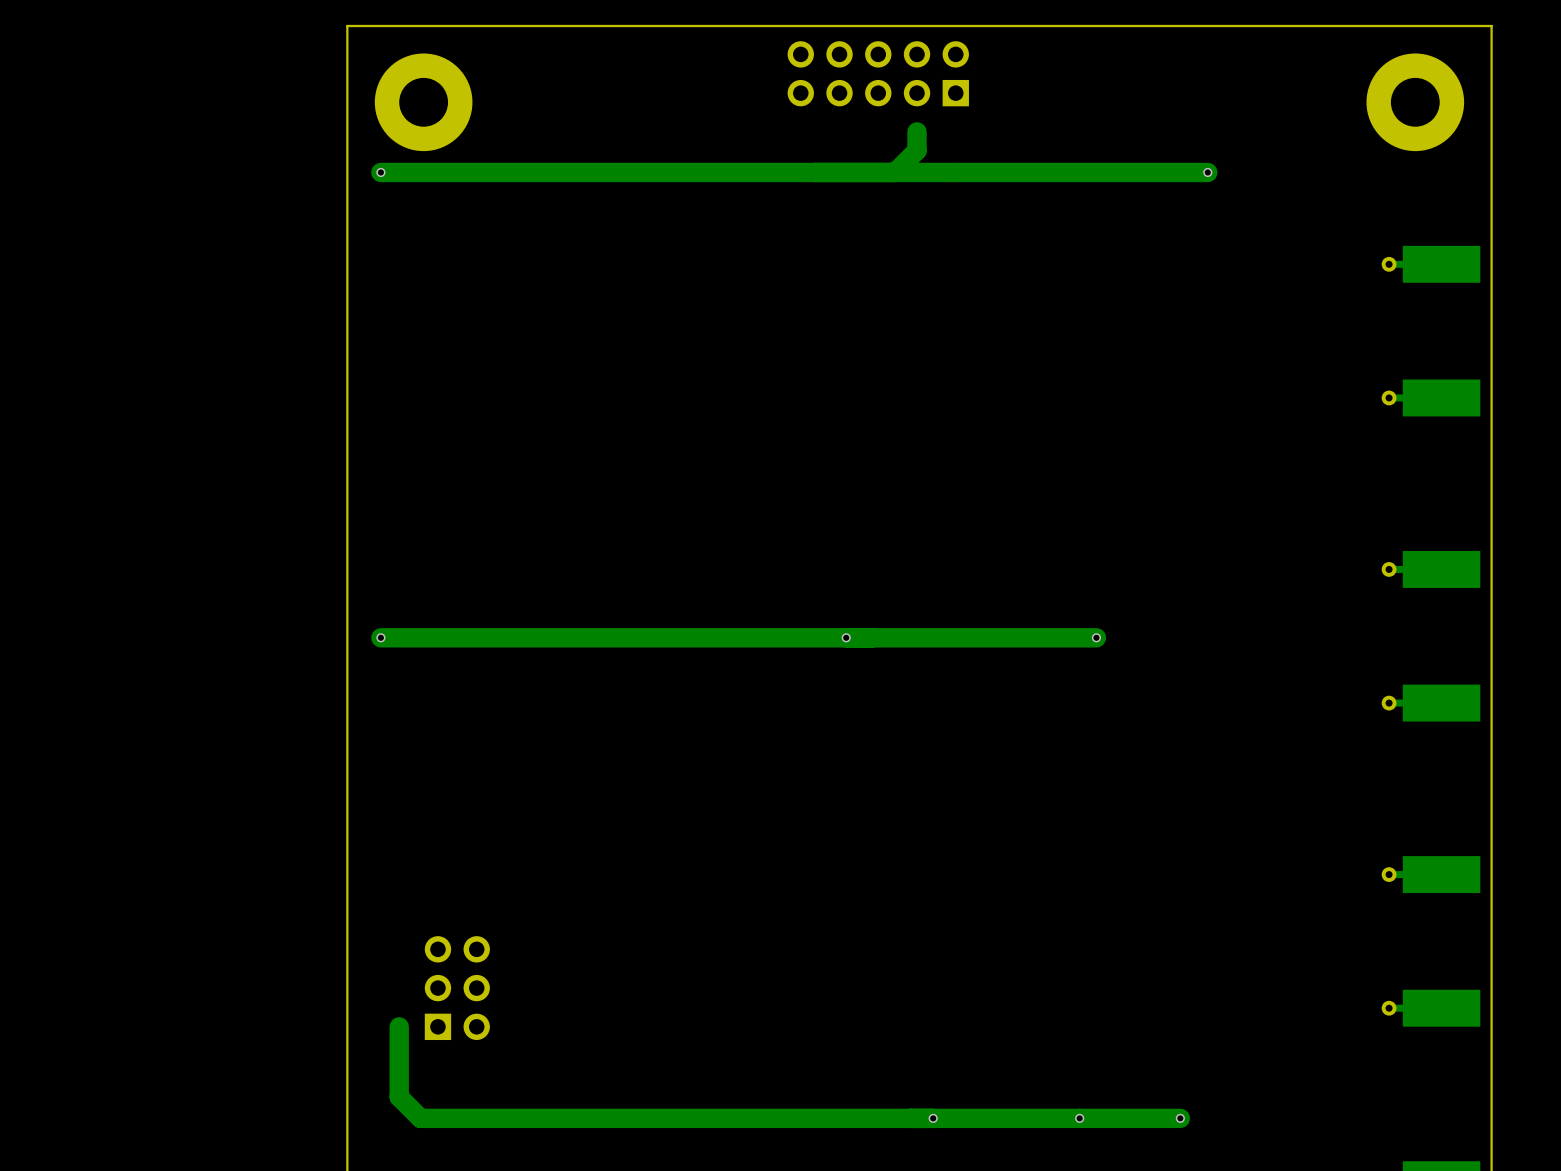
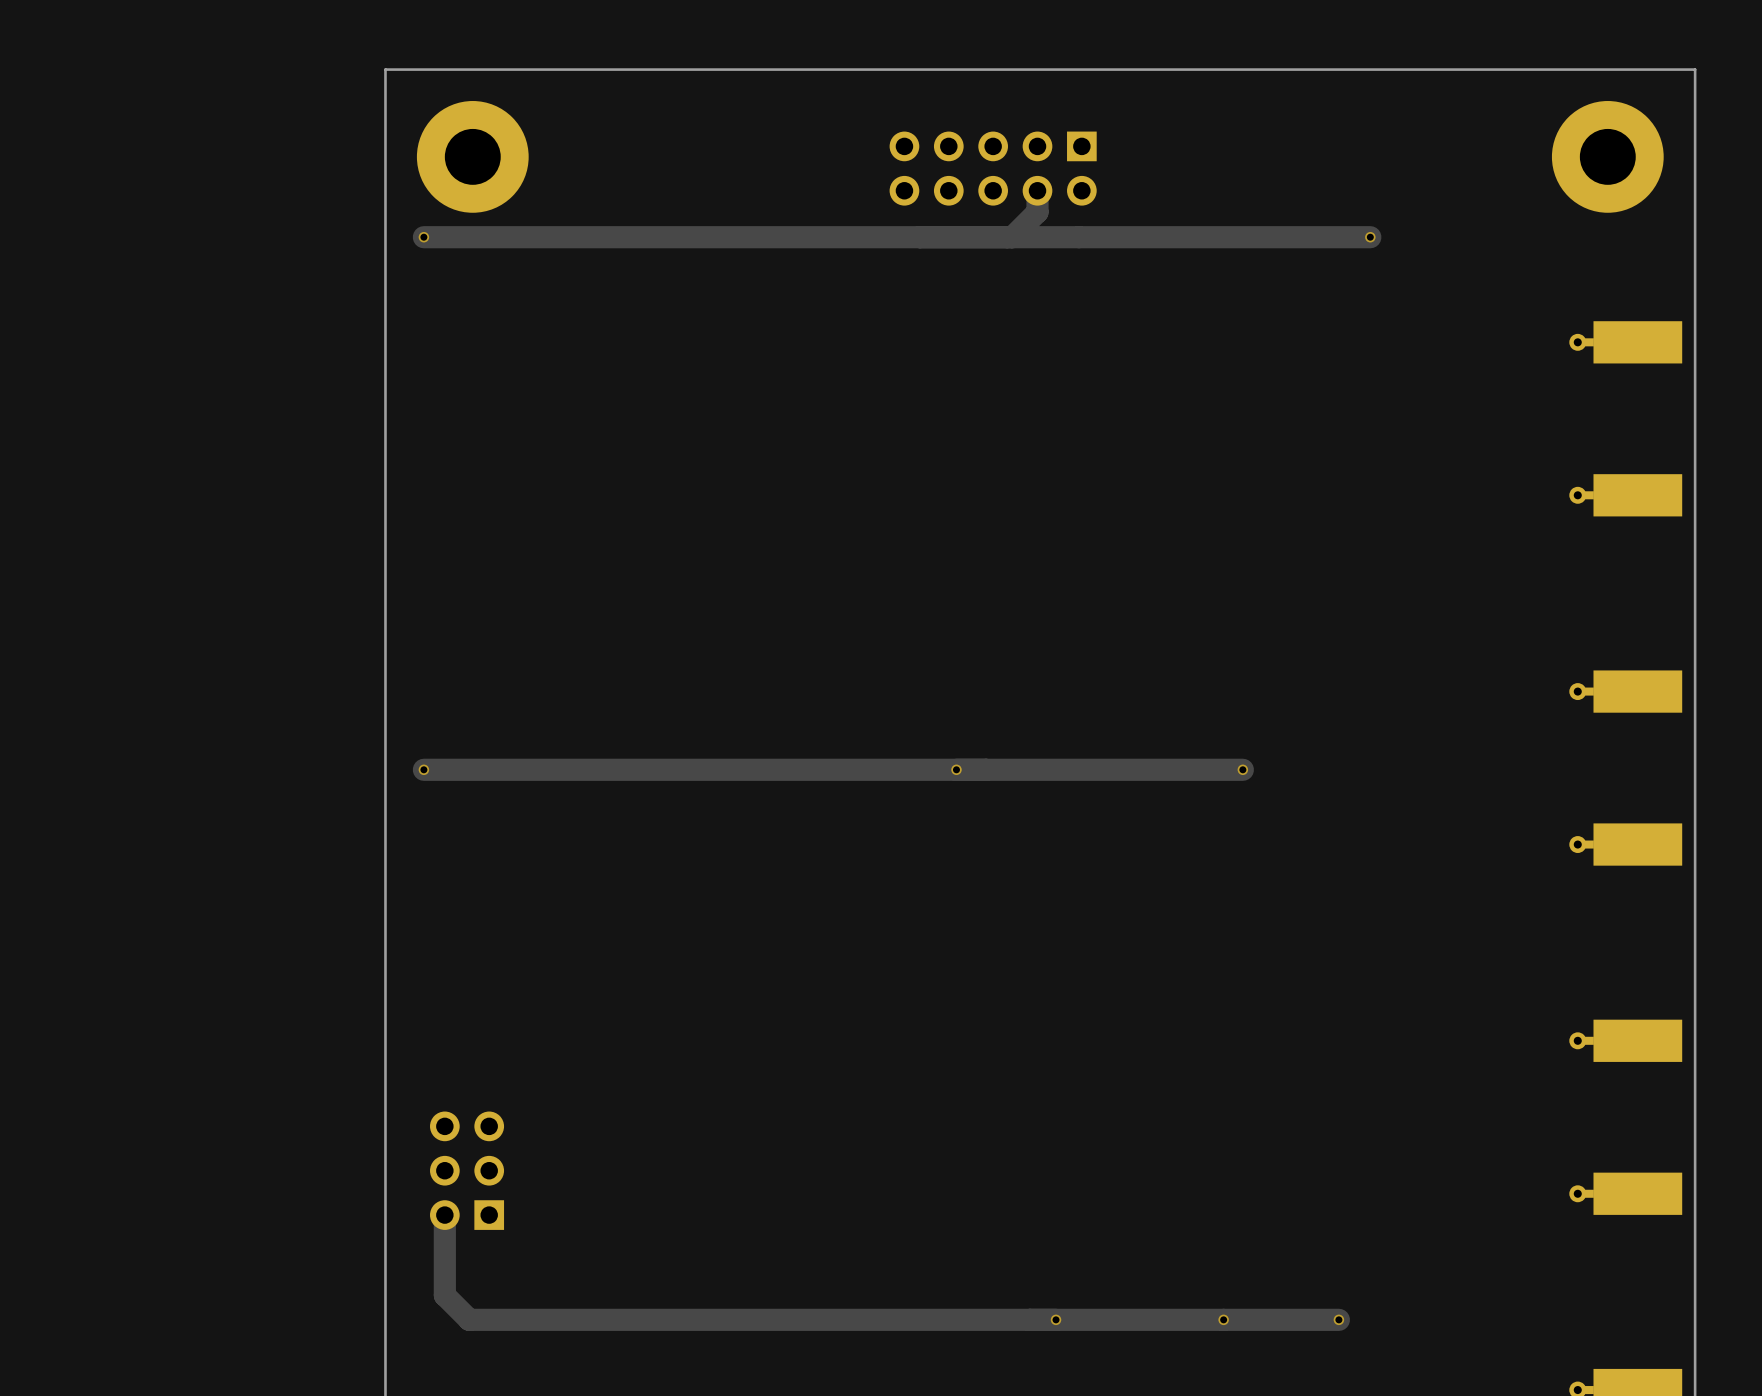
part: (878, 73) -> none
part: none -> (993, 168)
part: none -> (467, 1170)
part: (457, 988) -> none

